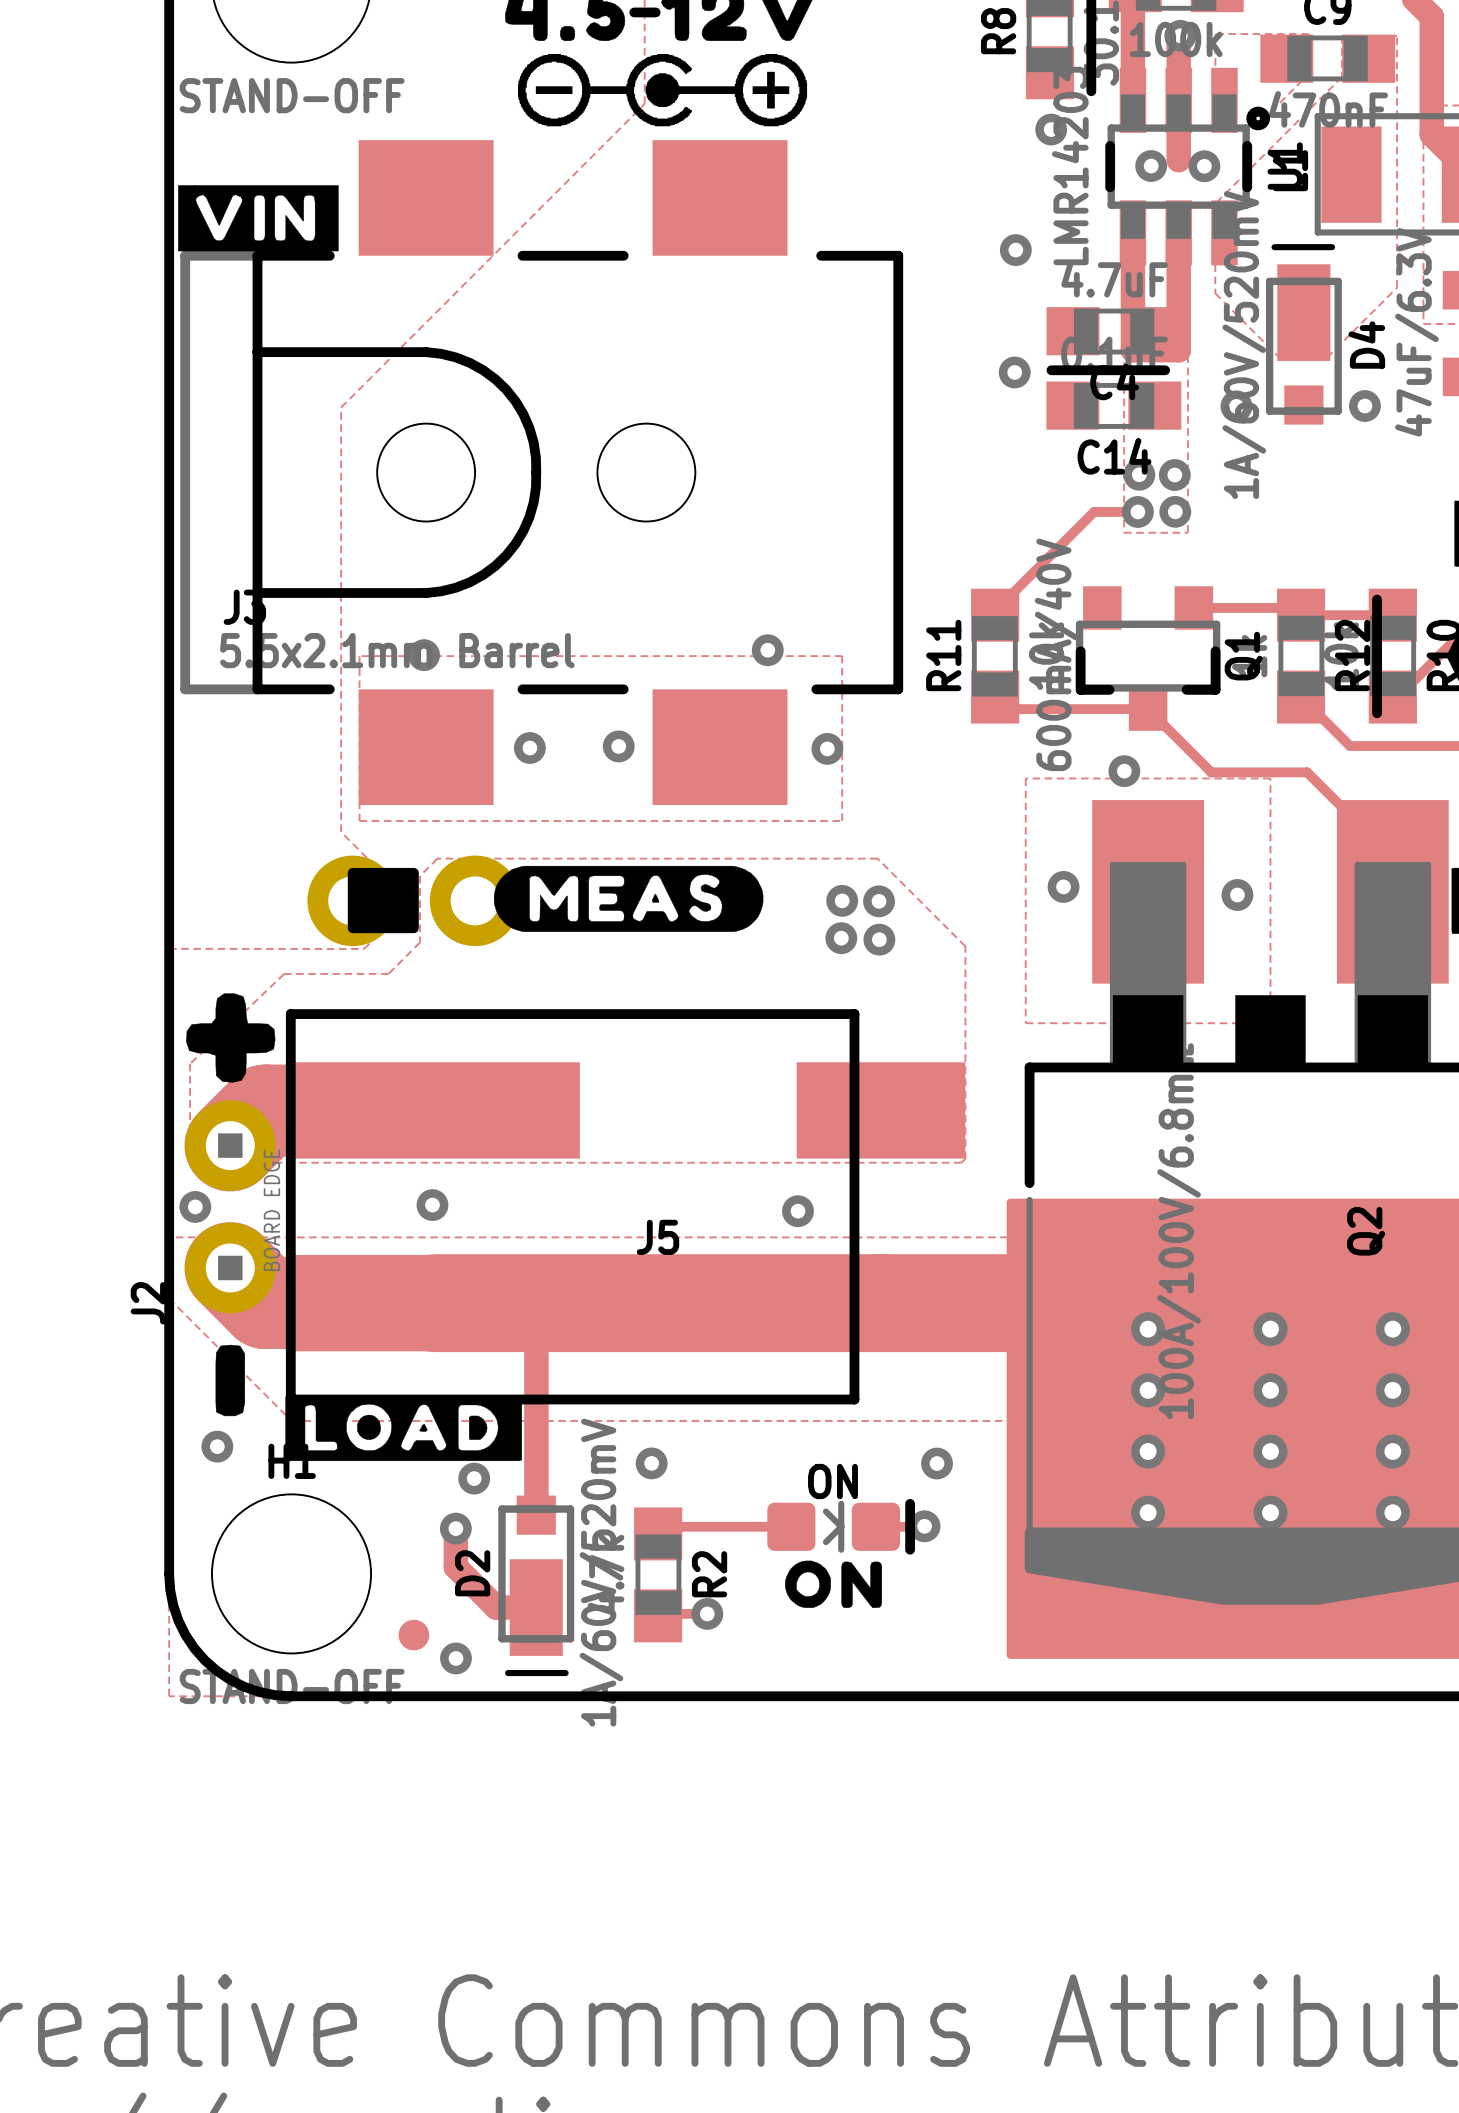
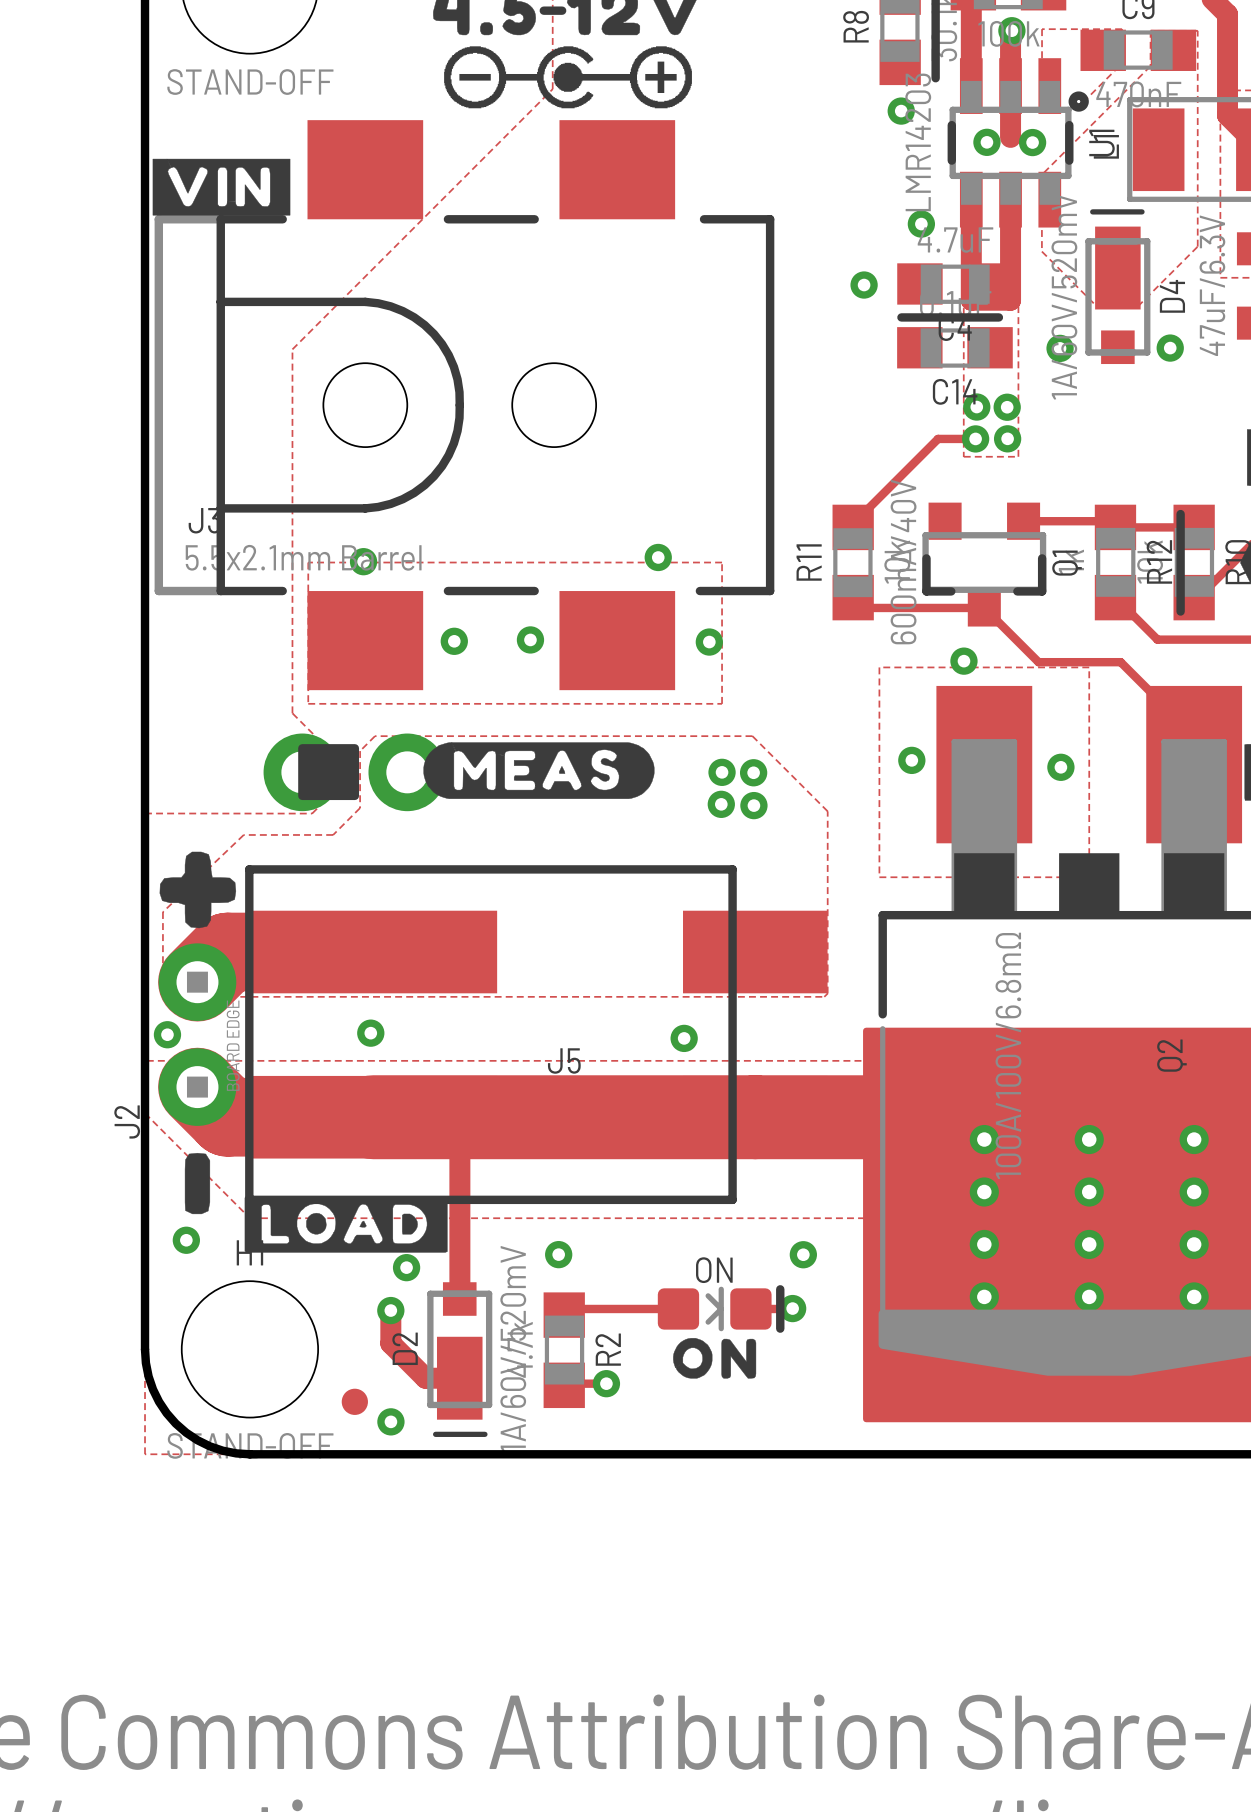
via: (1015, 250) -> none
via: none -> (921, 224)
via position: (1014, 372) -> (864, 285)

